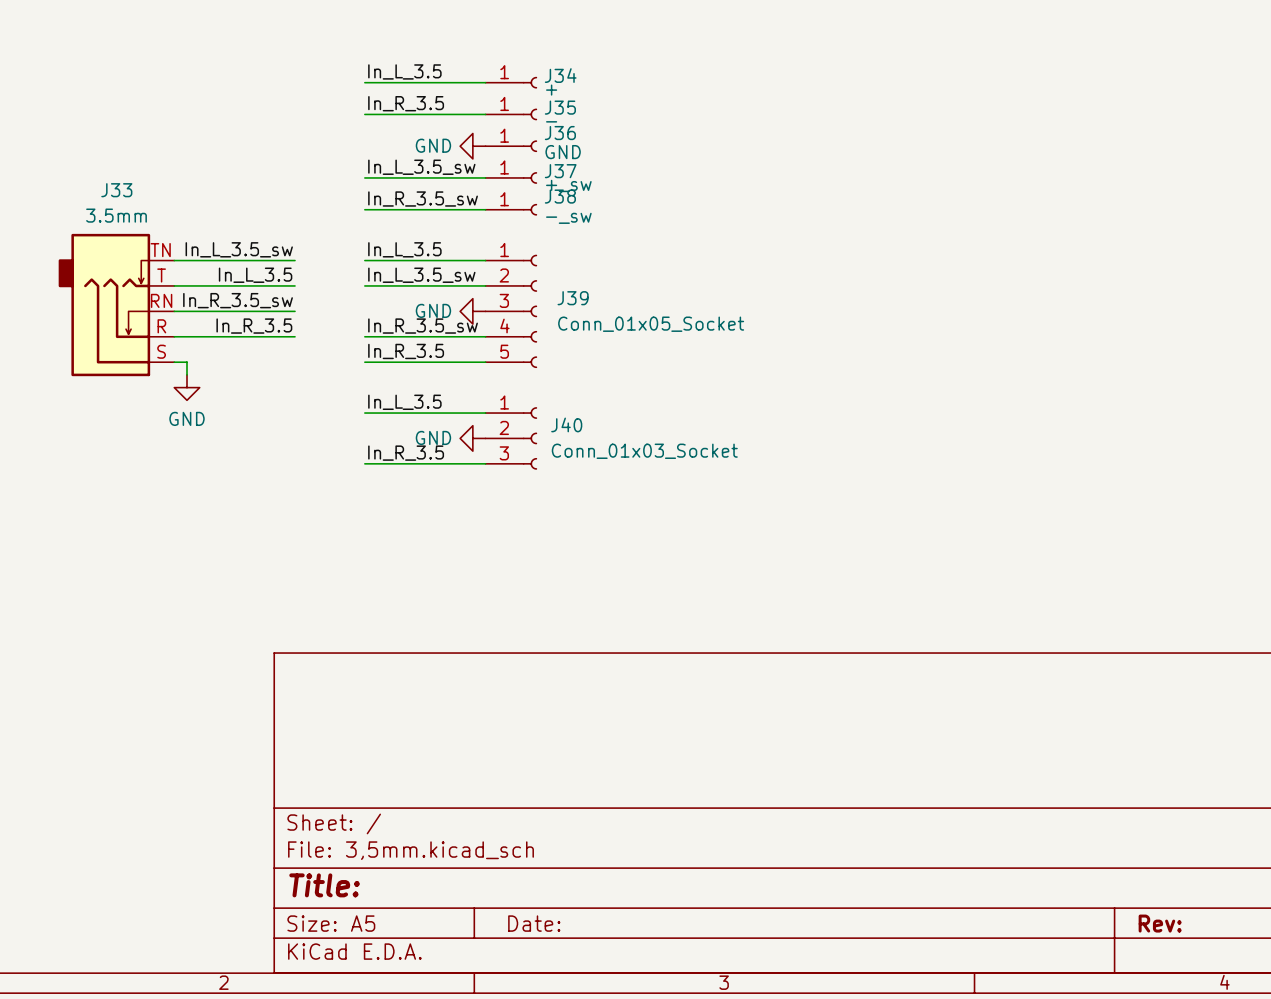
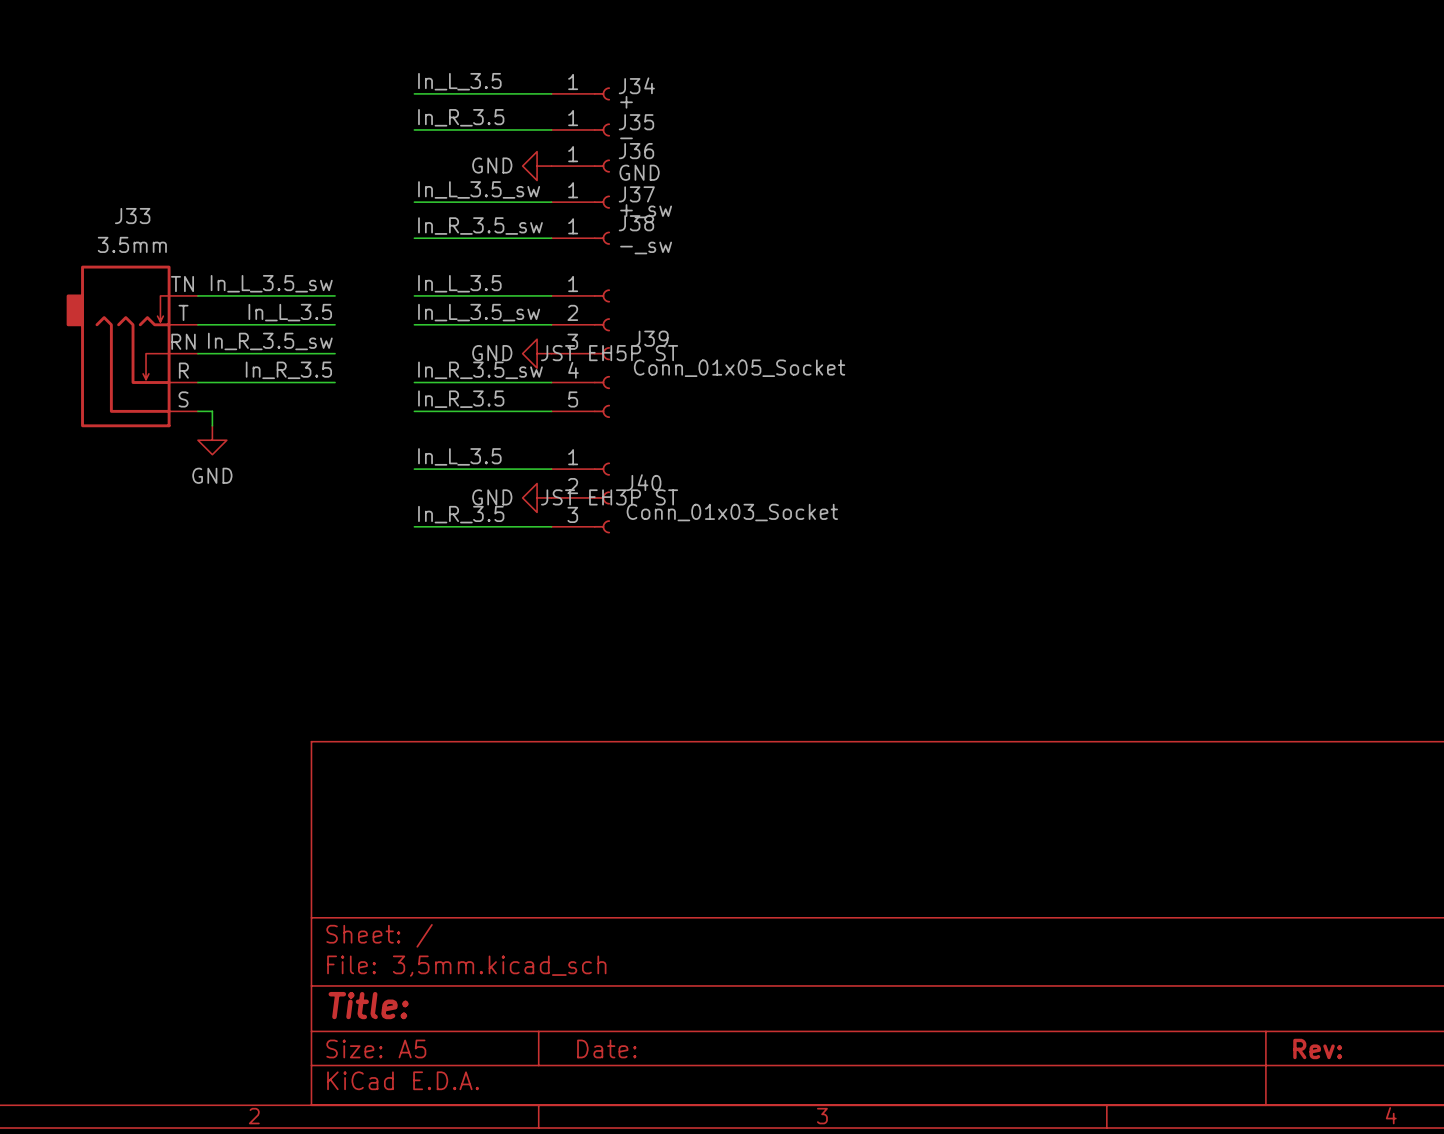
J39 text: none -> JST EH5P ST (609, 353)
J40 text: none -> JST EH3P ST (609, 497)

